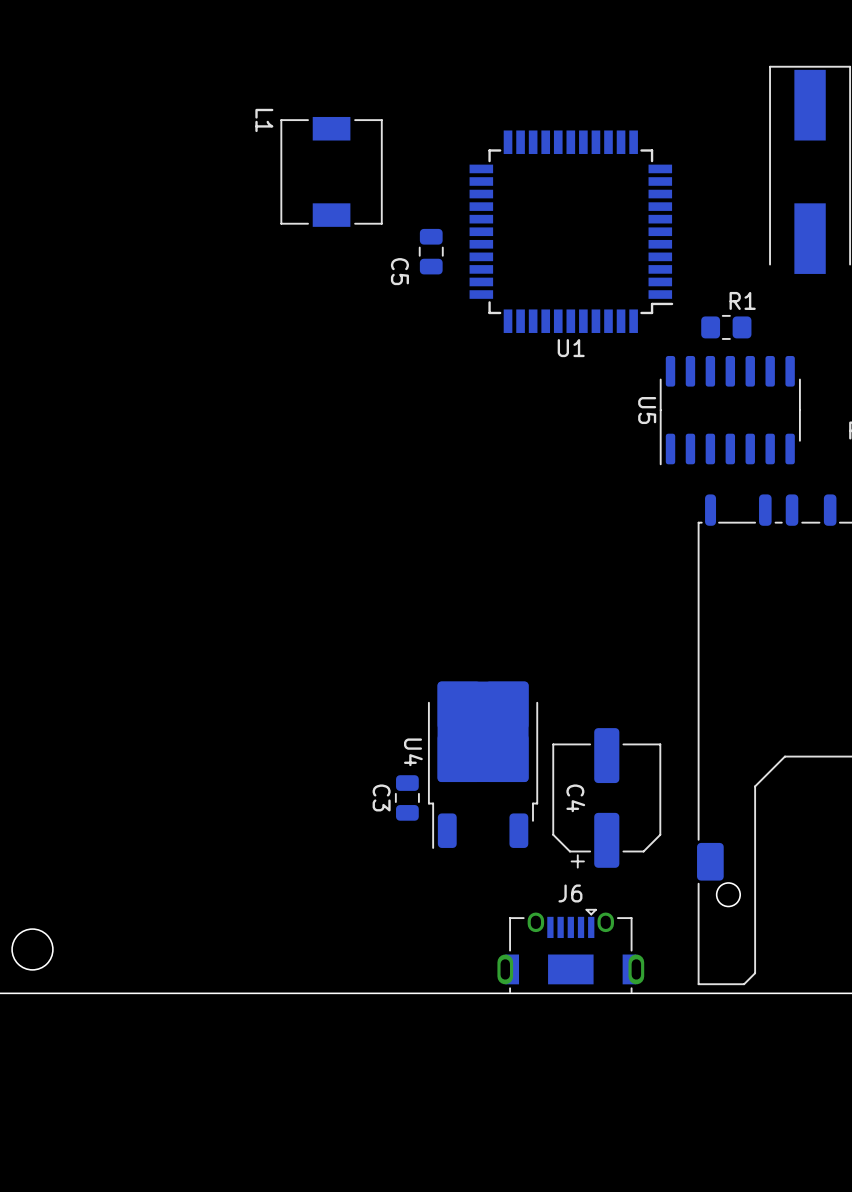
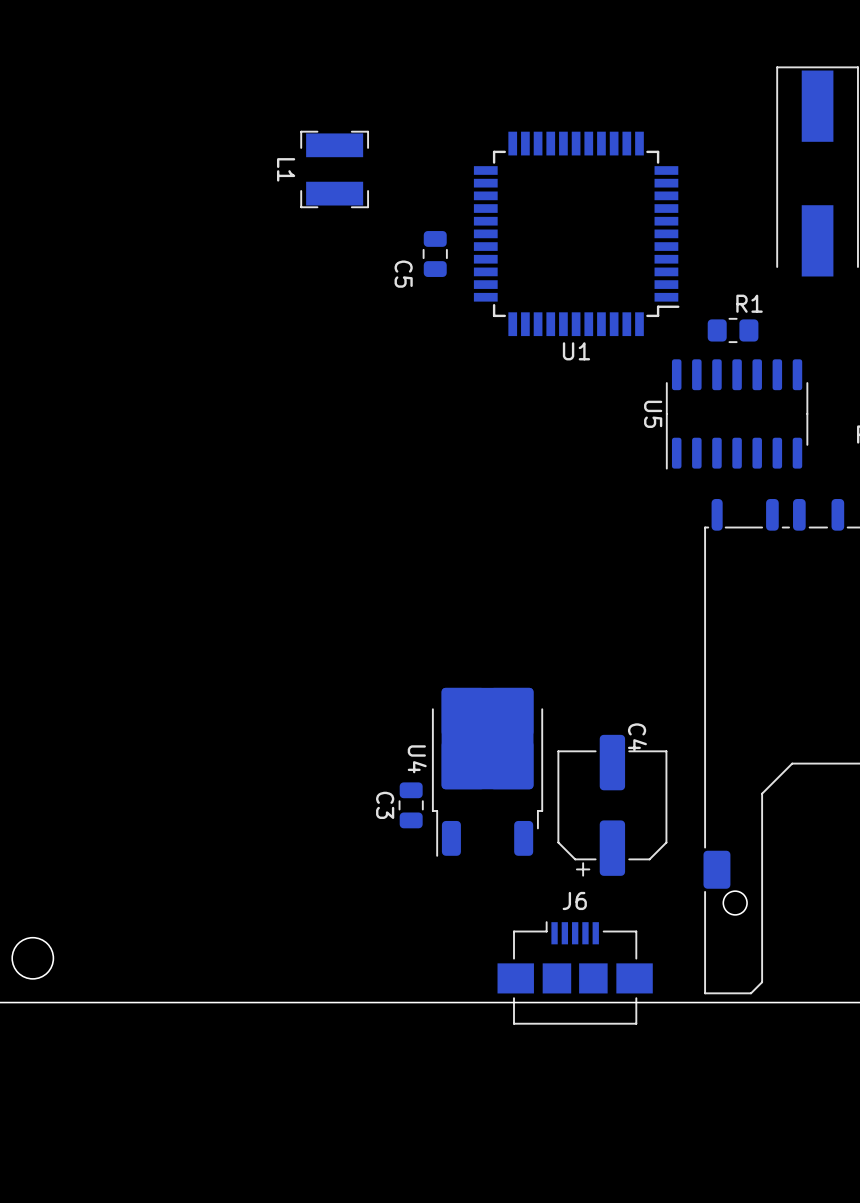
L1 footprint: [280, 116, 383, 227] -> [300, 130, 370, 209]
L1 name position: L1 (264, 120) -> L1 (286, 169)
C4 name position: C4 (575, 798) -> C4 (637, 737)
J6 footprint: [497, 908, 645, 994] -> [497, 921, 653, 1025]

